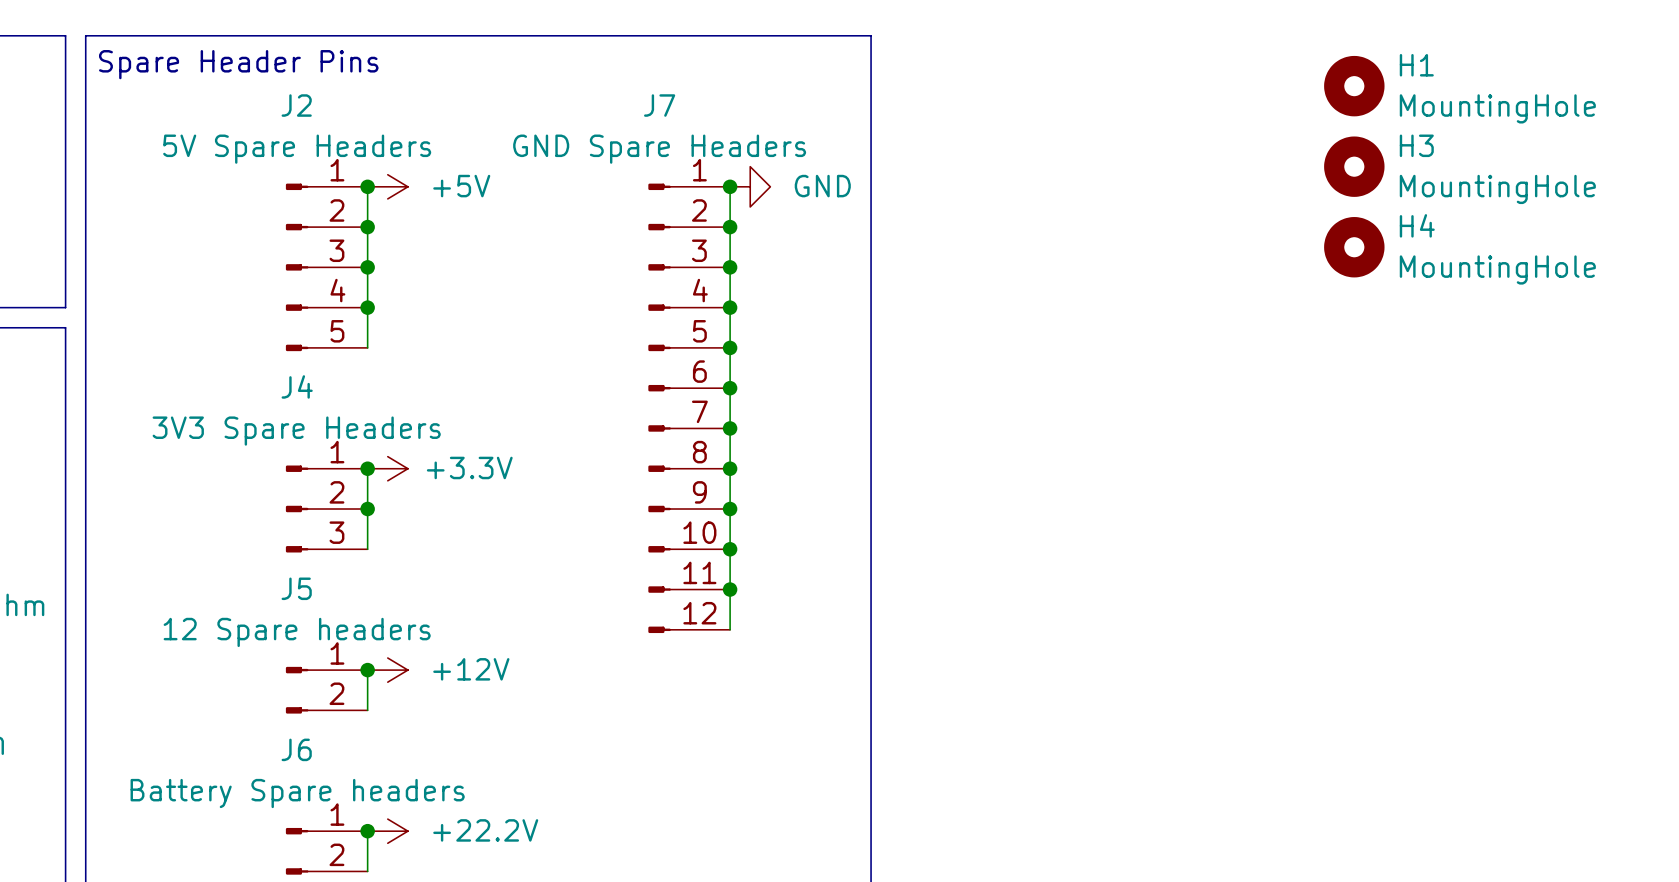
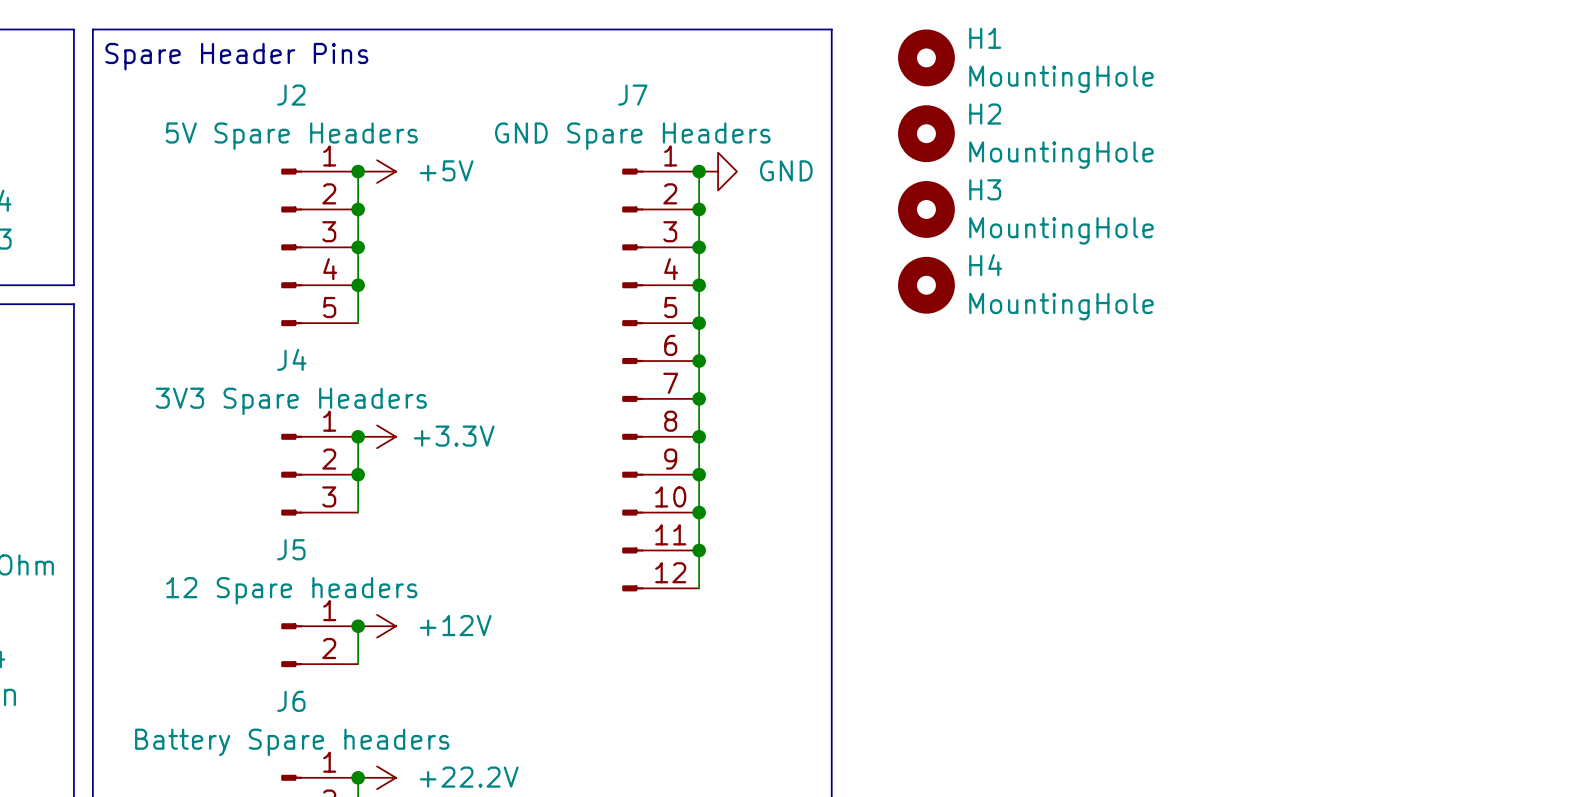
H1 position: (1354, 86) -> (926, 57)
H2: none -> MountingHole (926, 133)
H3 position: (1354, 166) -> (926, 209)
H4 position: (1354, 247) -> (926, 285)

